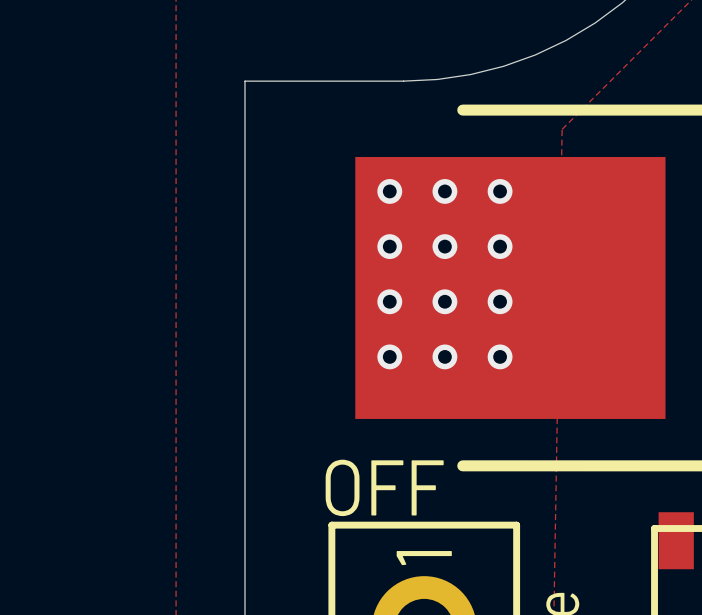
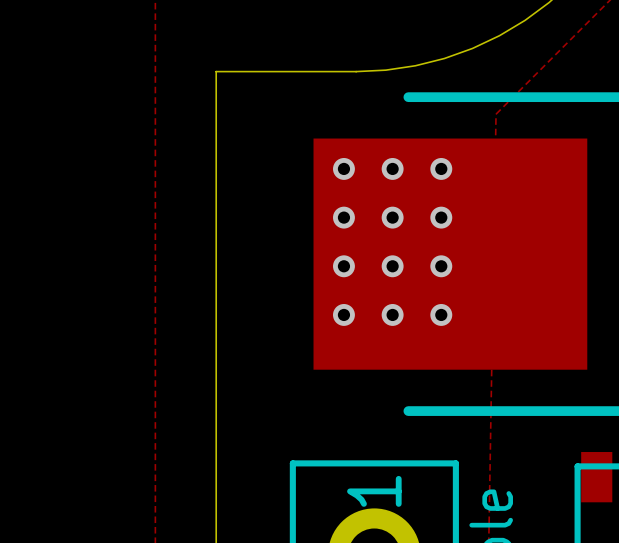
text: OFF (384, 487) -> none

